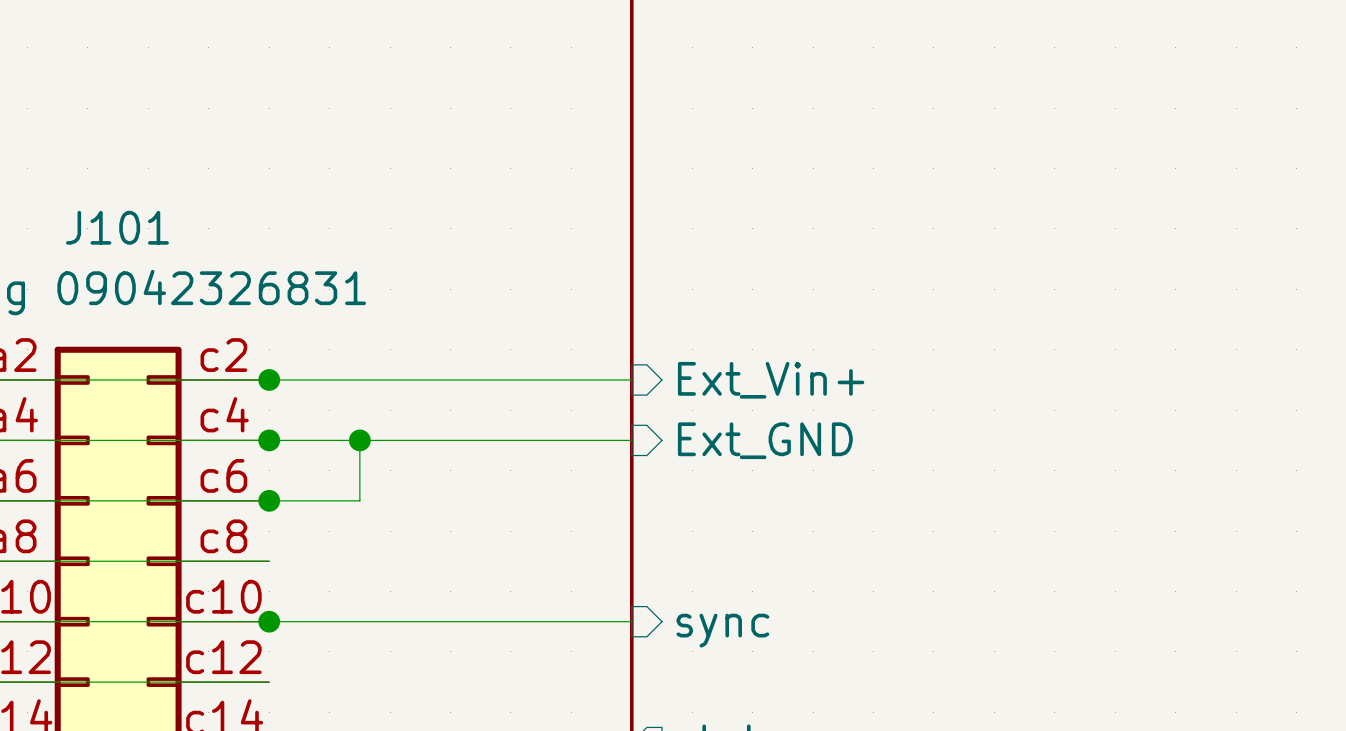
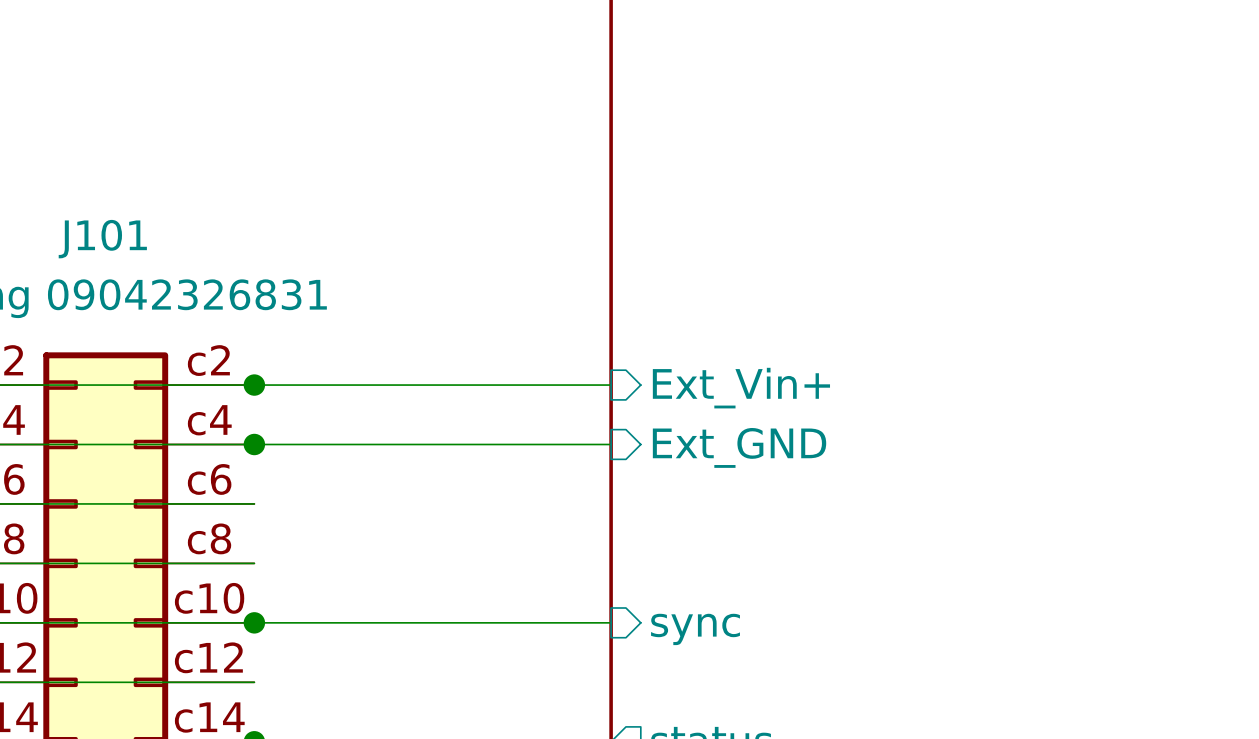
wire: (359, 440) (359, 500) (269, 500) -> none
junction: (359, 440) -> none
junction: (269, 500) -> none

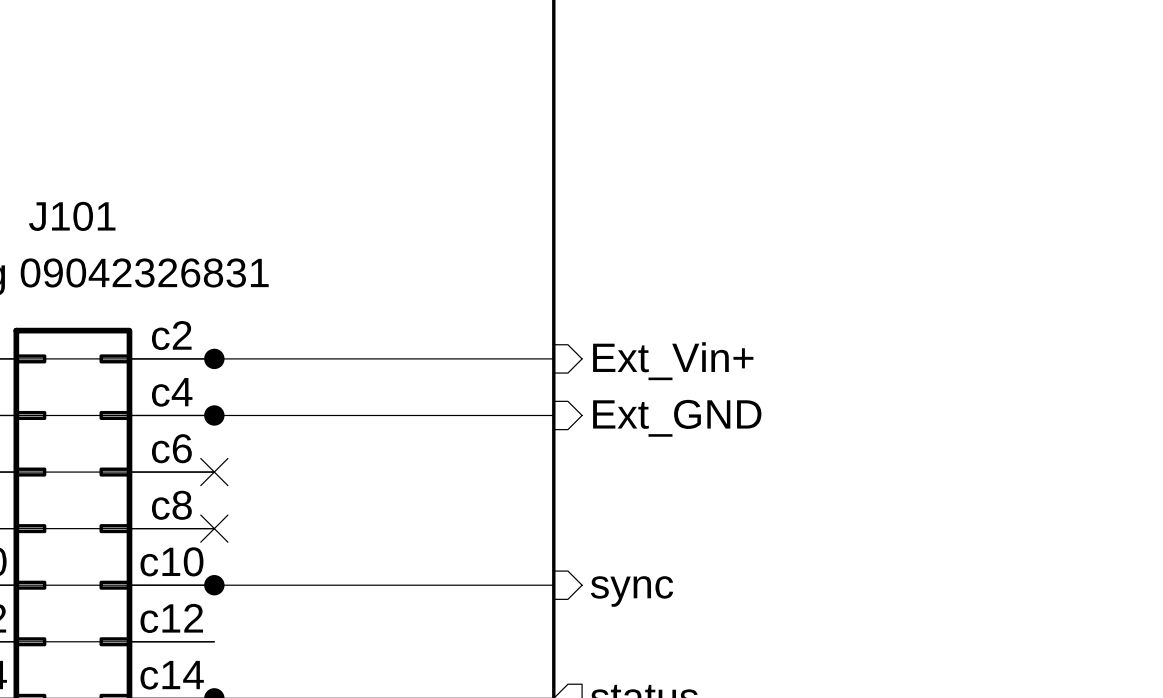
no-connect mark: none -> (214, 472)
no-connect mark: none -> (214, 528)

